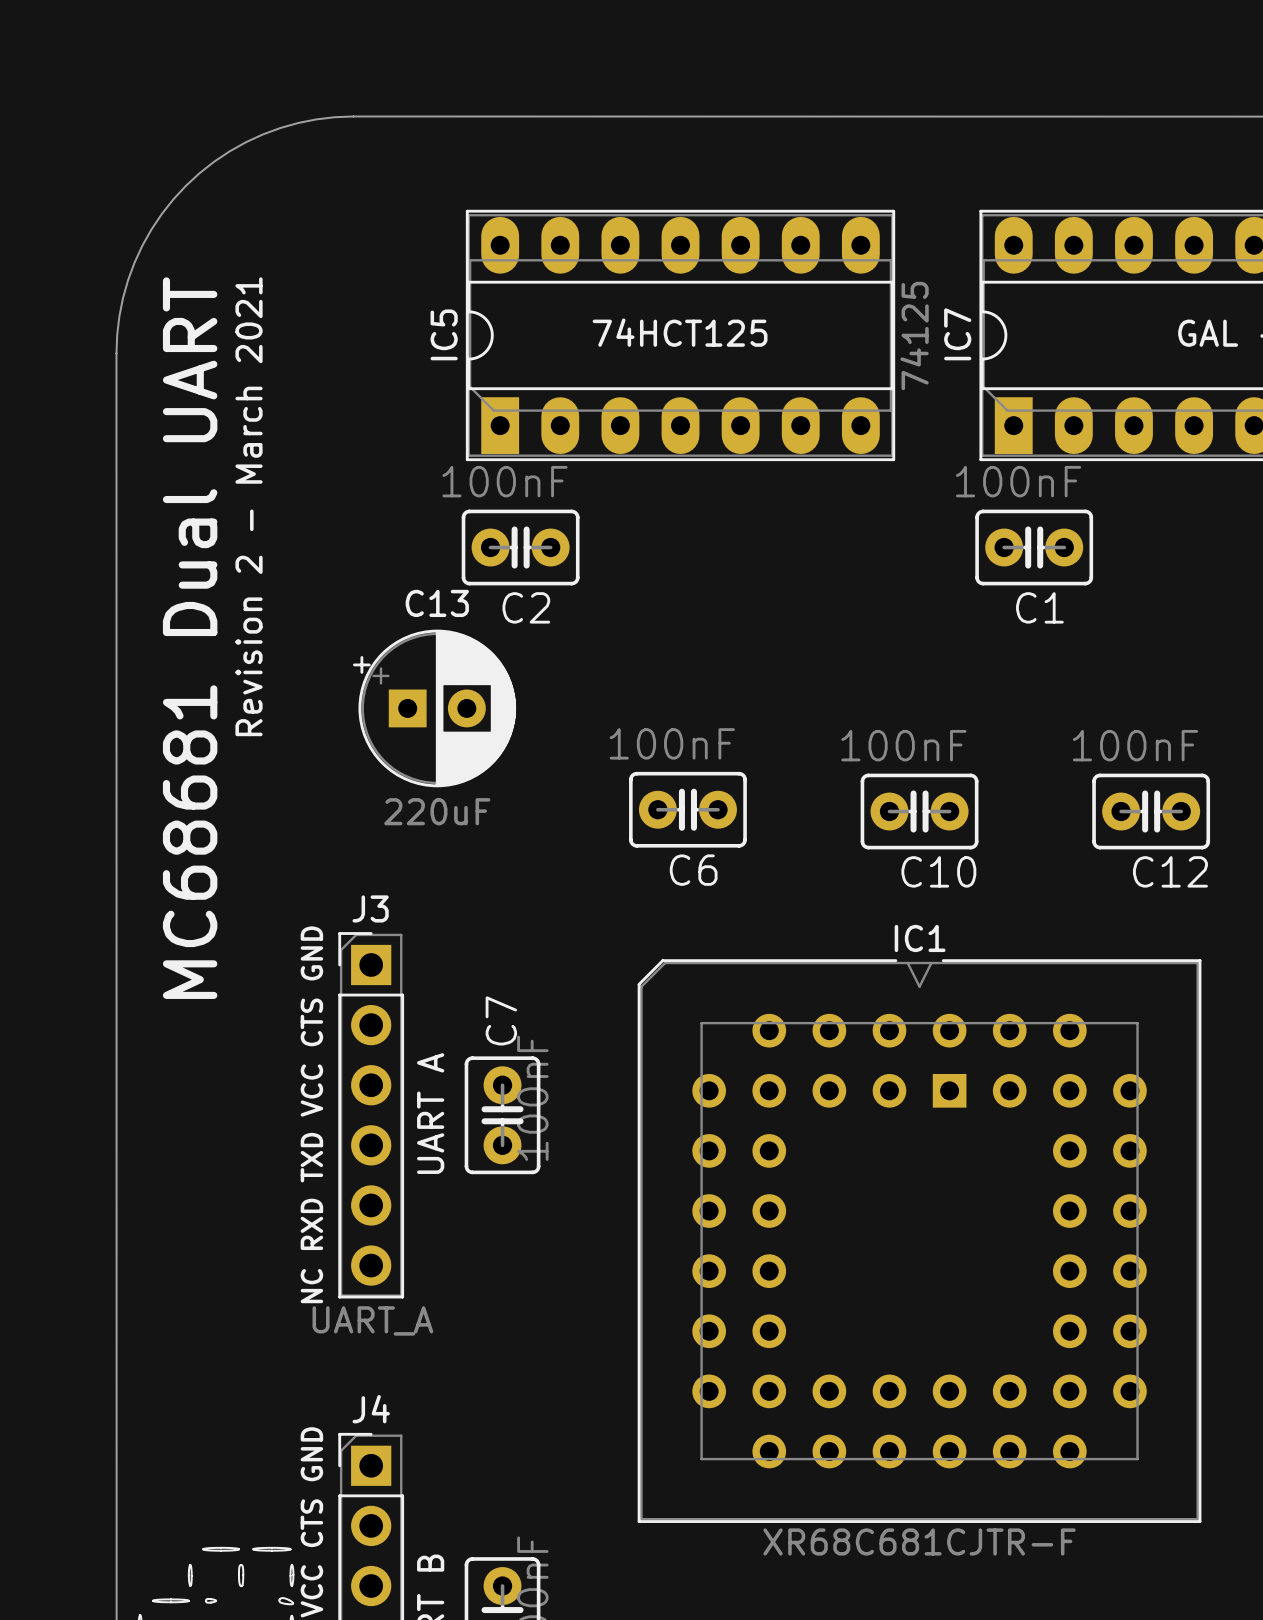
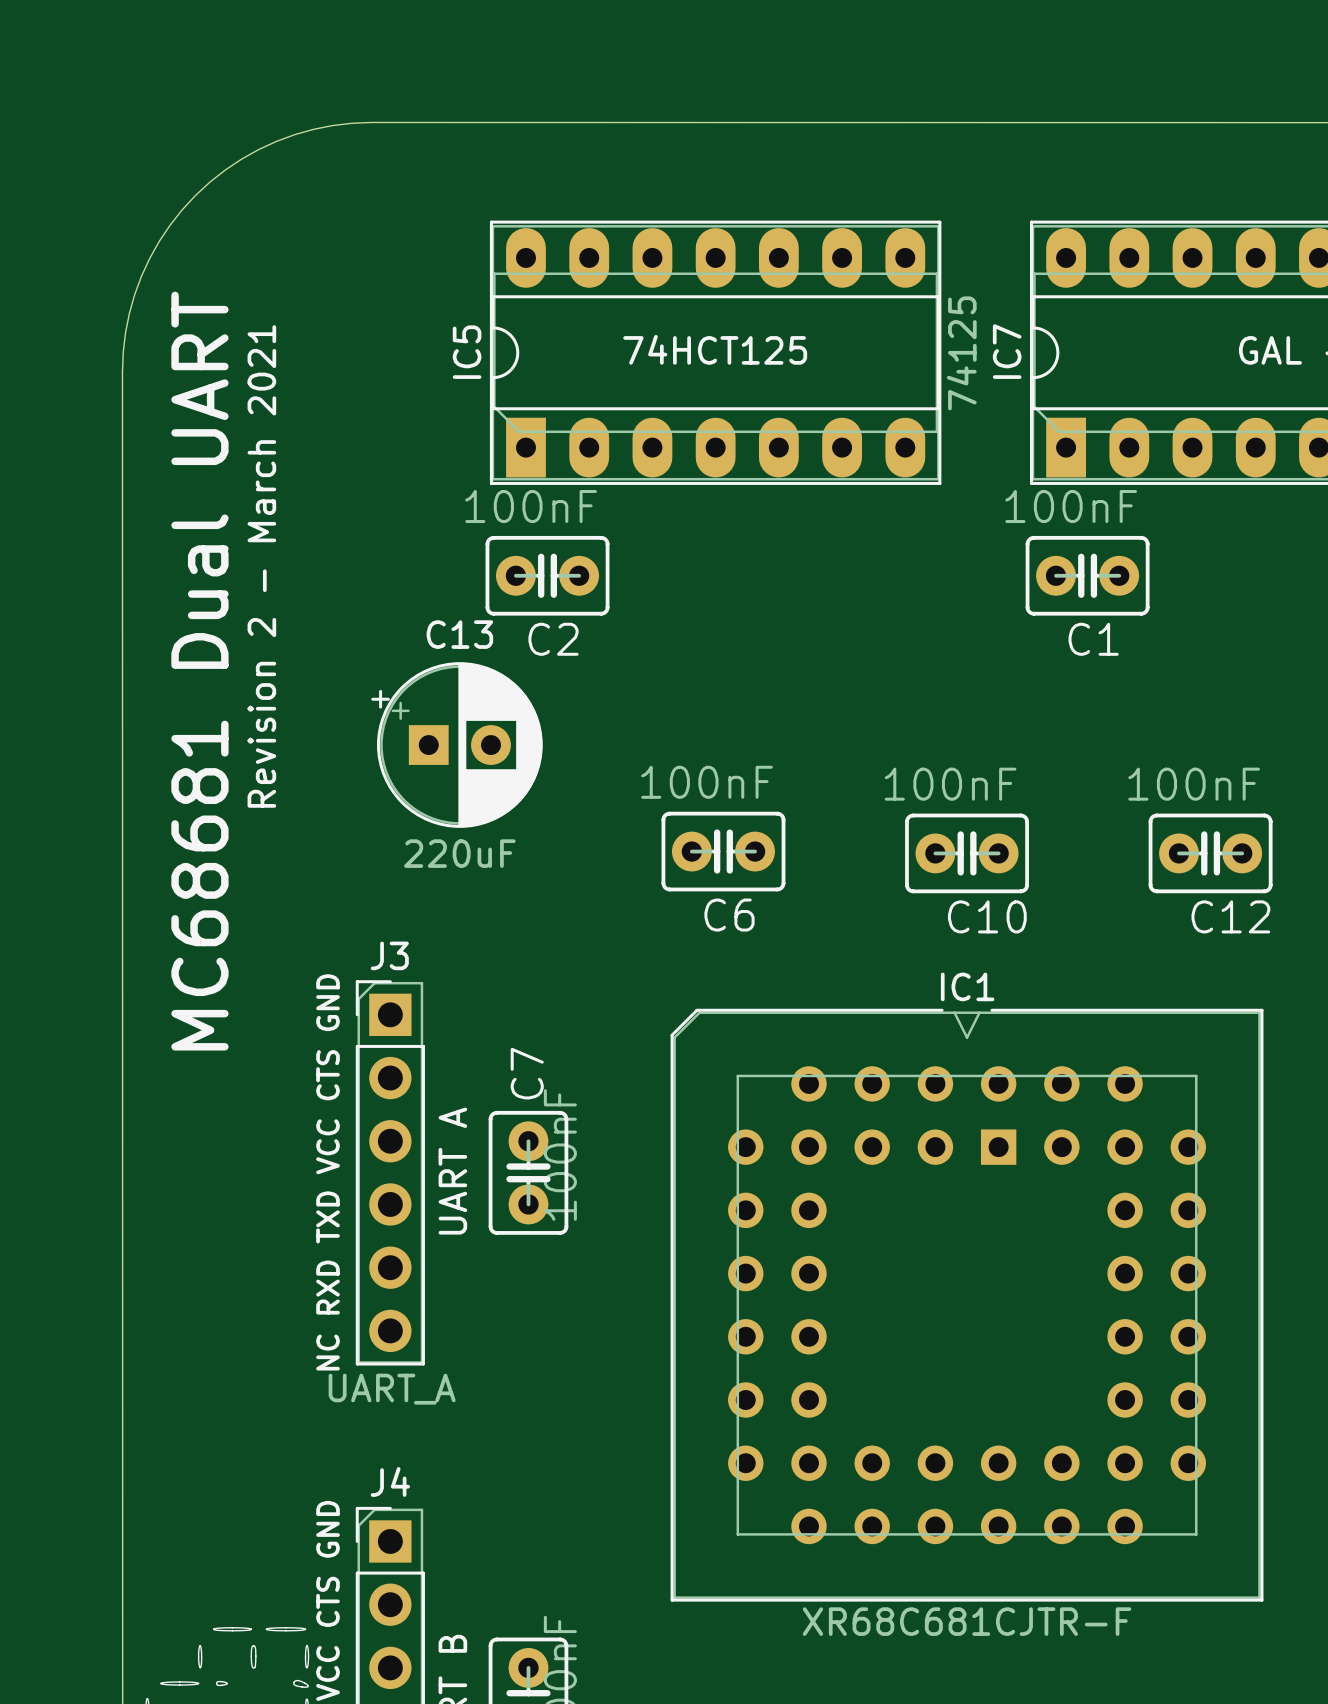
text position: Revision 2 - March 2021 (249, 506) -> Revision 2 - March 2021 (261, 566)

